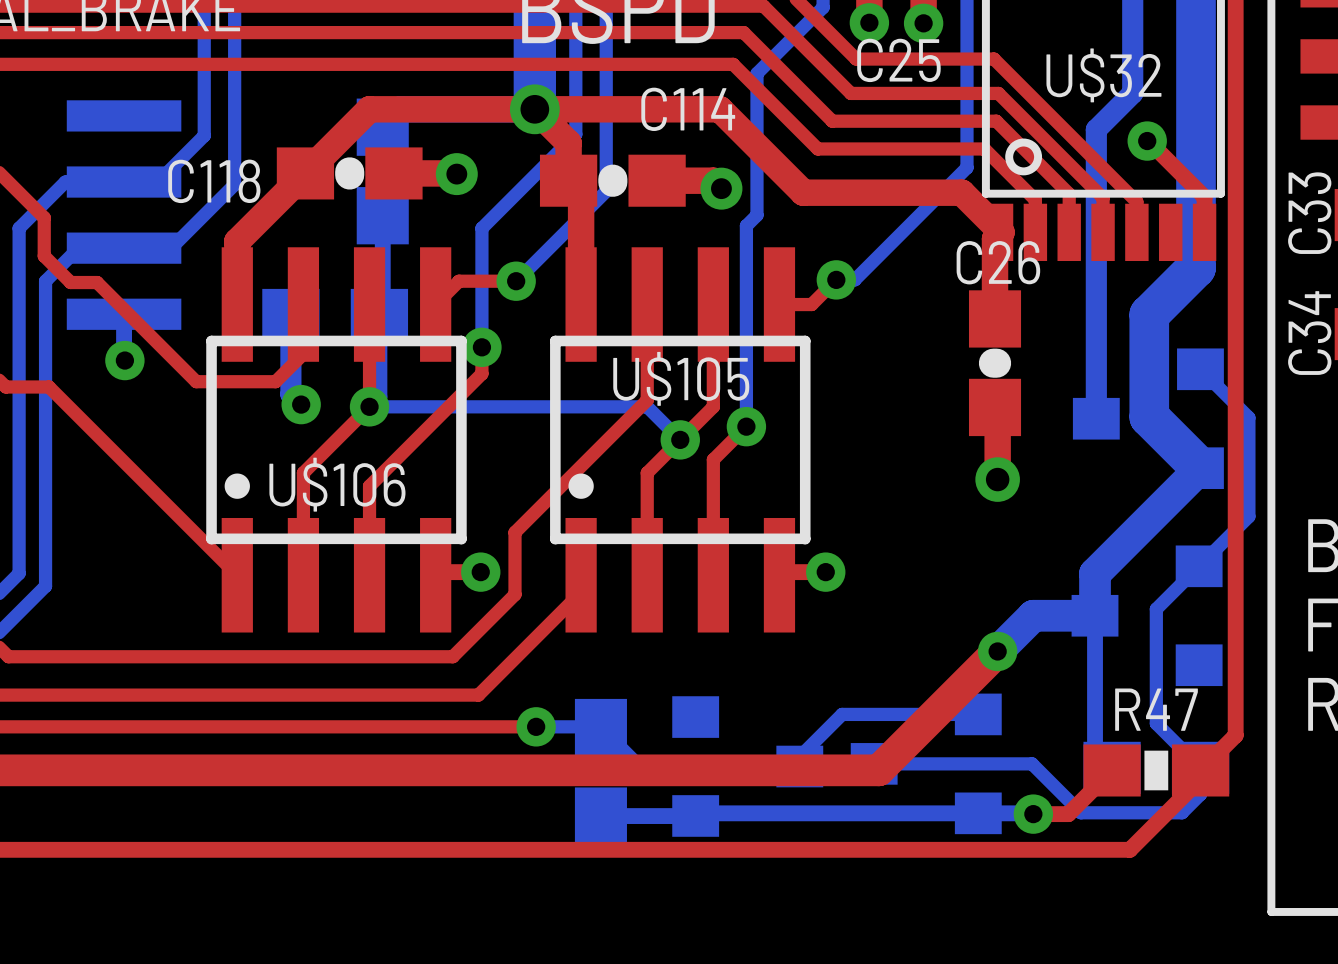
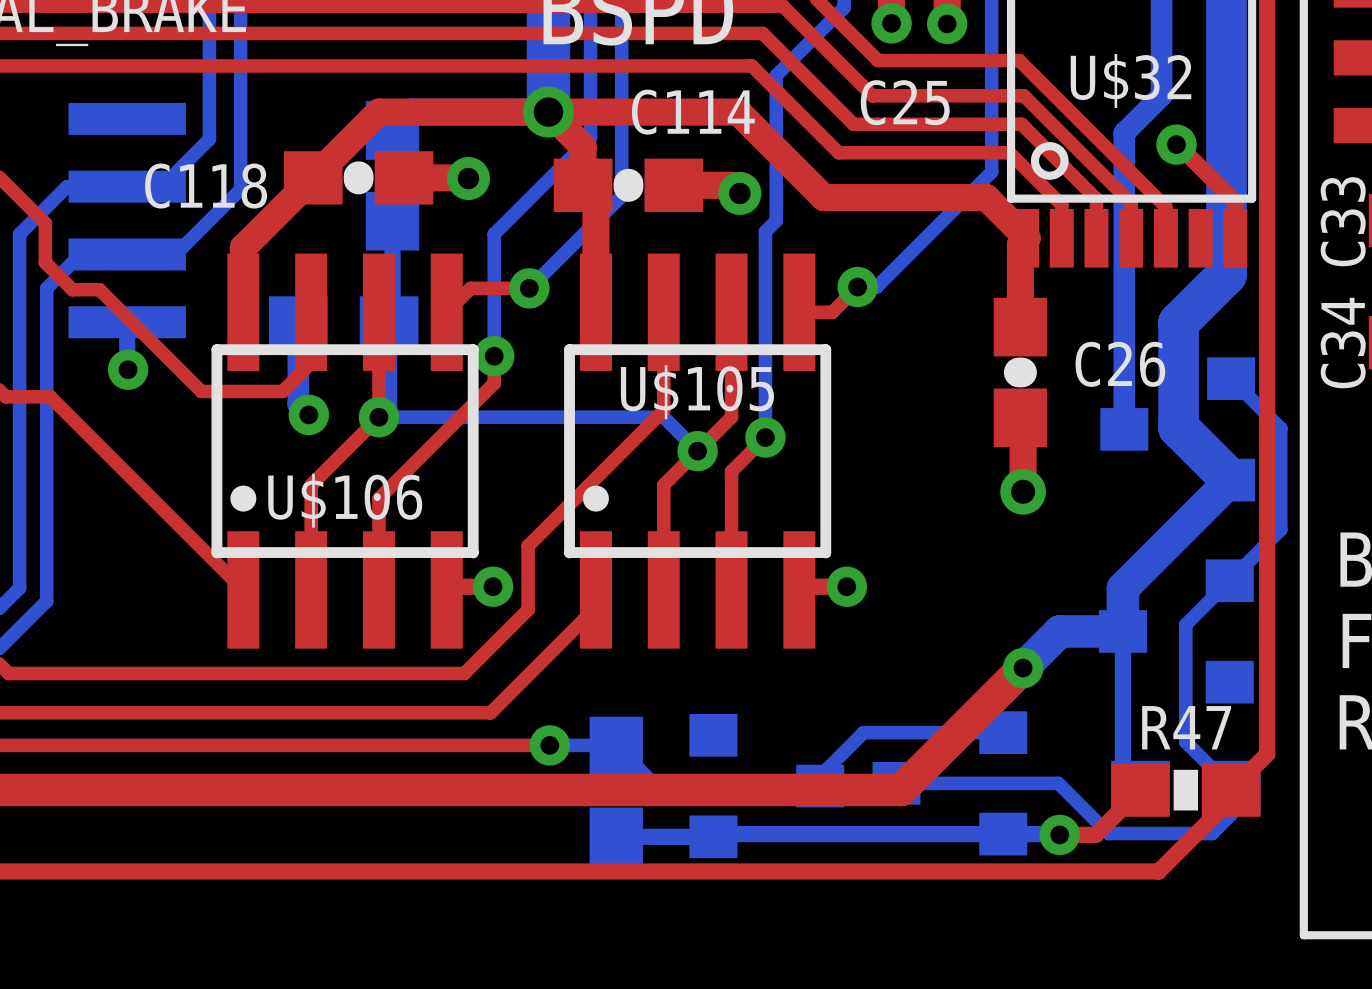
C25 name position: C25 (898, 60) -> C25 (905, 102)
C26 name position: C26 (998, 262) -> C26 (1120, 364)

